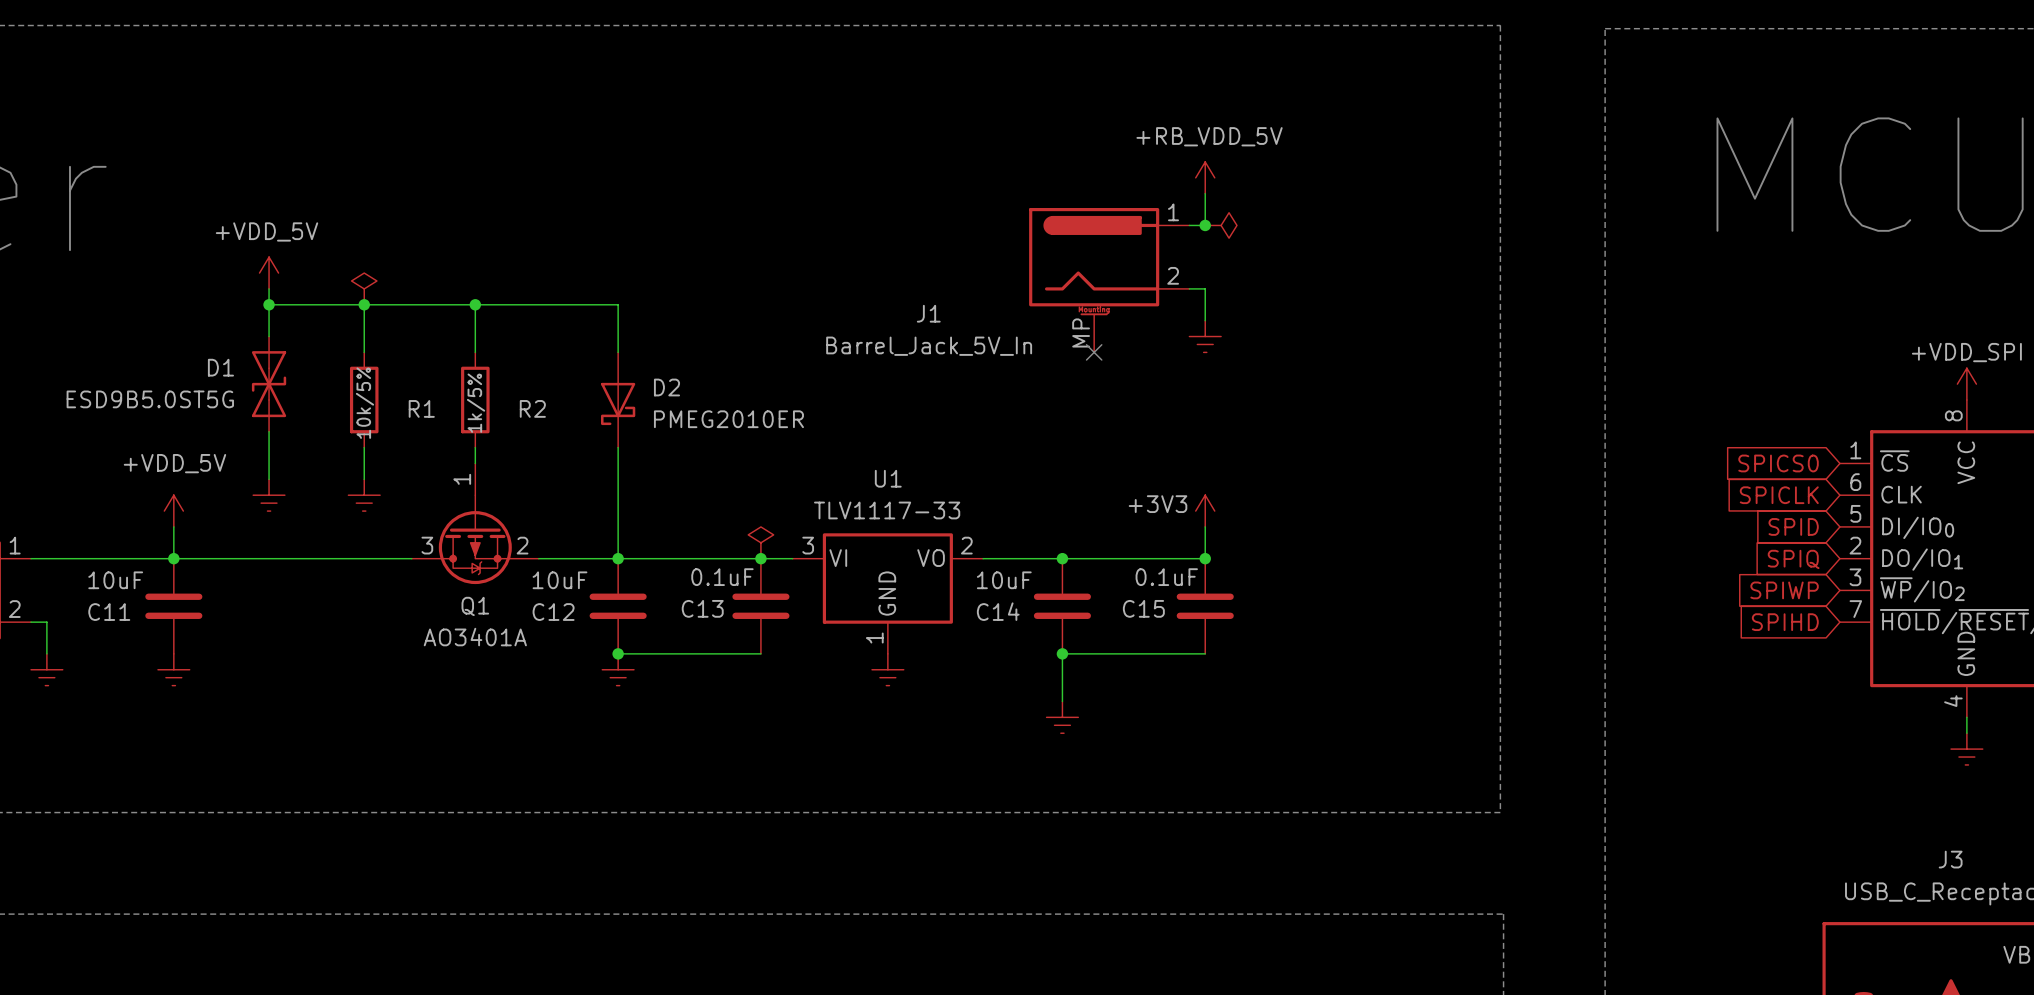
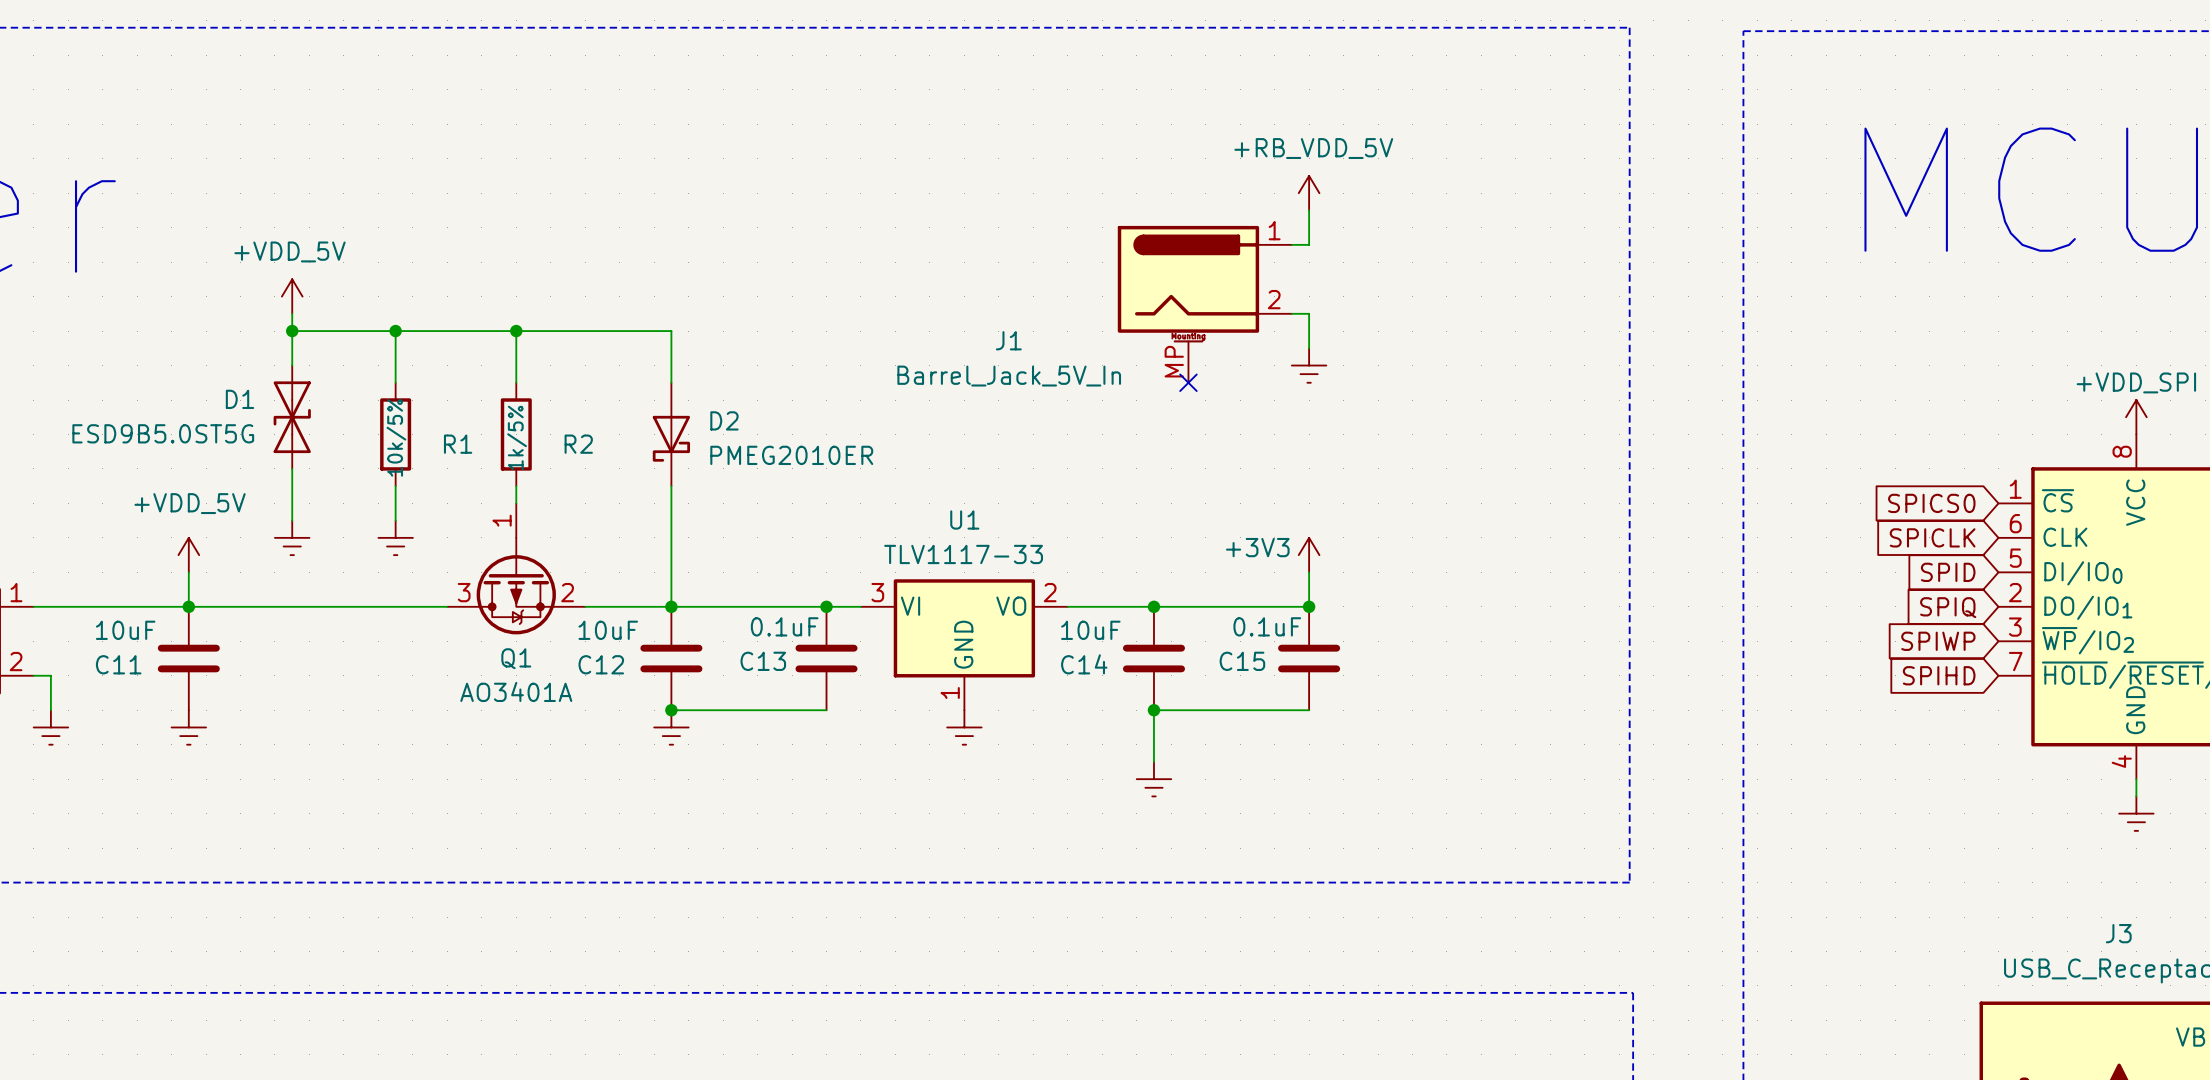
junction: (1205, 225) -> none
power symbol: (1221, 225) -> none
power symbol: (364, 288) -> none
power symbol: (760, 542) -> none

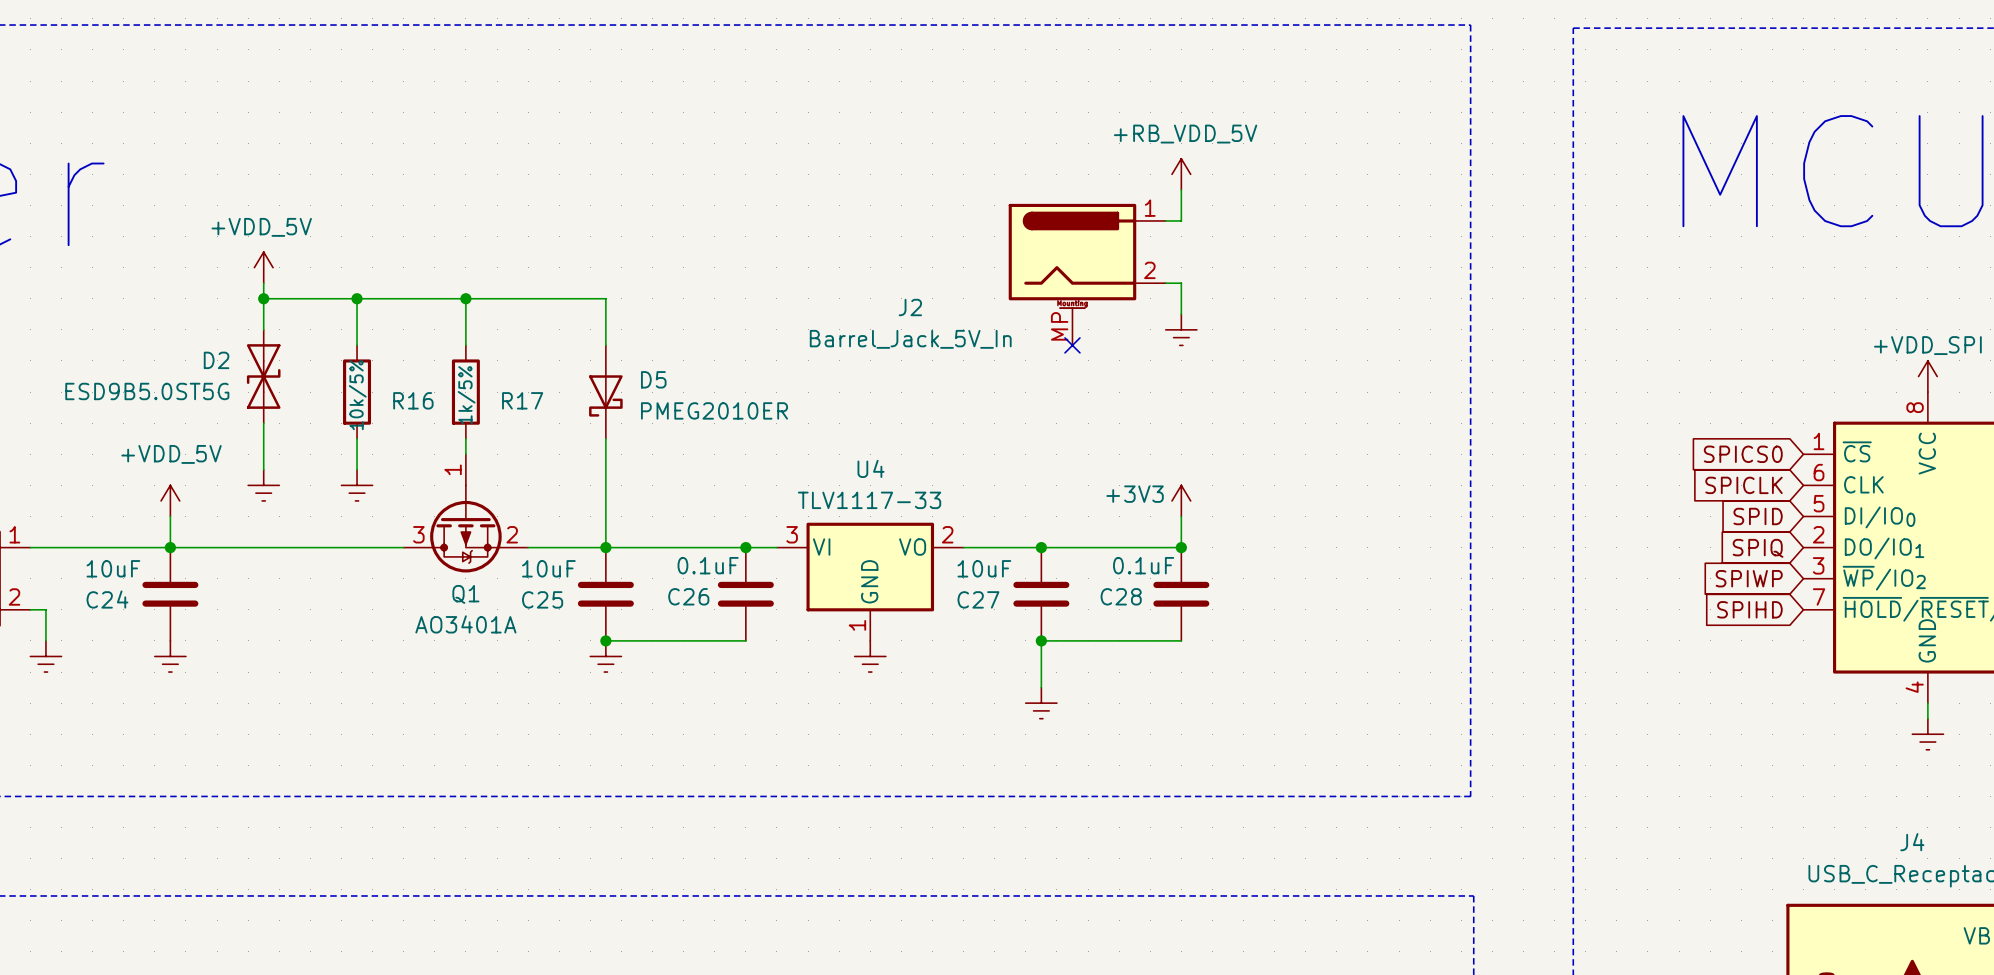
J1 name: J1 (1008, 340) -> J2 (910, 307)
D1 name: D1 (239, 399) -> D2 (216, 360)
D2 name: D2 (724, 420) -> D5 (653, 379)
R1 name: R1 (458, 444) -> R16 (413, 400)
R2 name: R2 (578, 444) -> R17 (522, 400)
U1 name: U1 (964, 520) -> U4 (871, 468)
C13 name: C13 (763, 661) -> C26 (688, 596)
C15 name: C15 (1242, 661) -> C28 (1121, 596)
C11 name: C11 (118, 664) -> C24 (107, 599)
C12 name: C12 (601, 664) -> C25 (542, 599)
C14 name: C14 (1084, 664) -> C27 (978, 599)
J3 name: J3 (2118, 933) -> J4 (1912, 842)

